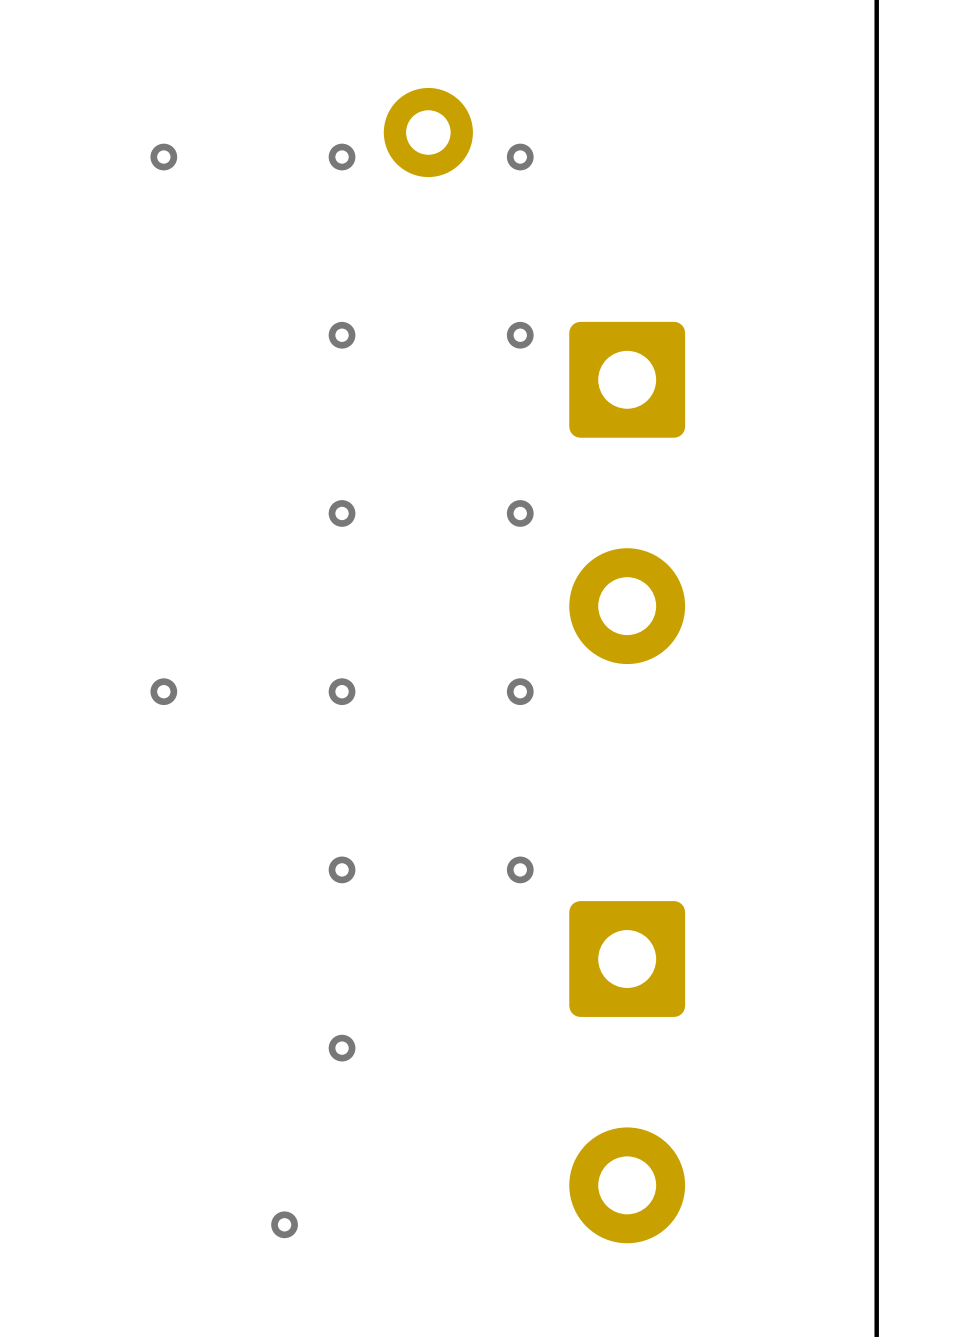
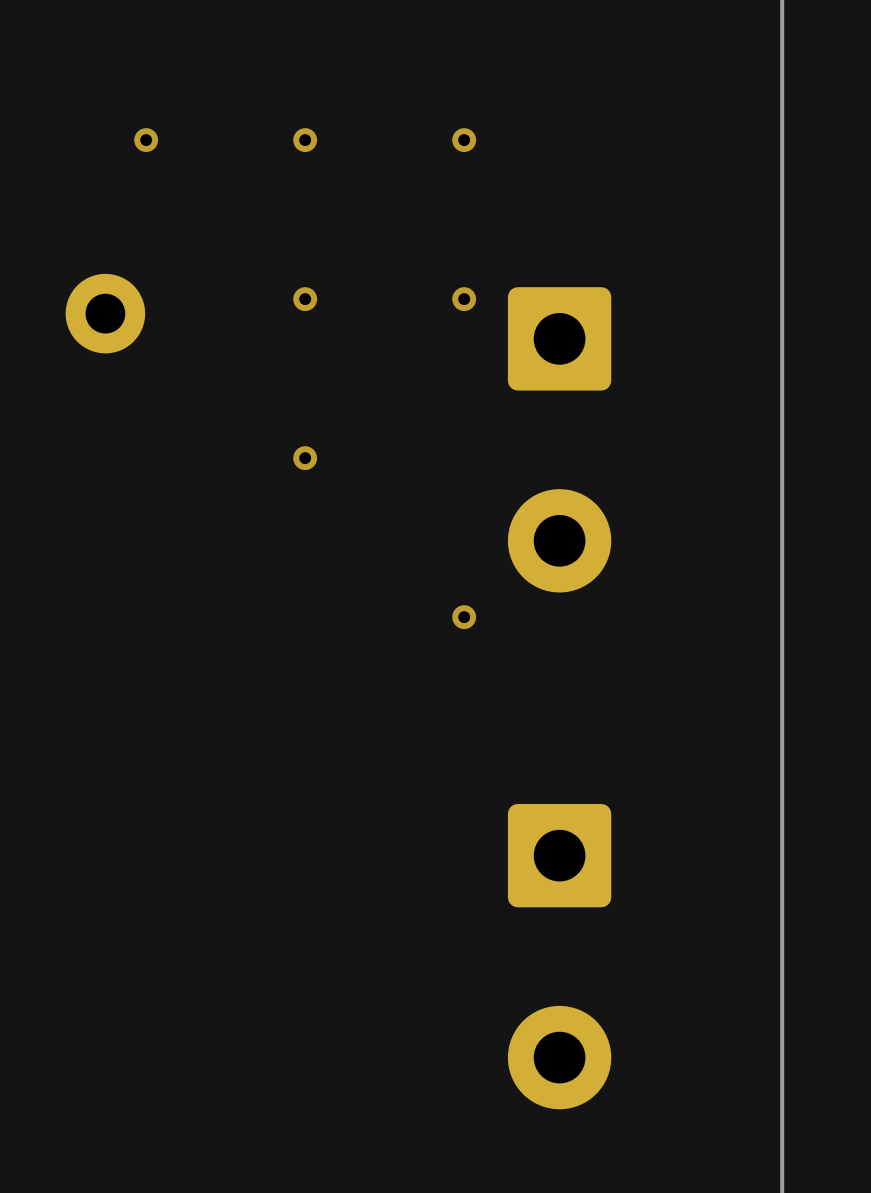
part position: (428, 132) -> (105, 313)
via: (520, 513) -> none
via: (163, 691) -> none
via: (342, 691) -> none
via: (342, 869) -> none
via: (520, 869) -> none
via: (342, 1048) -> none
via: (284, 1224) -> none

